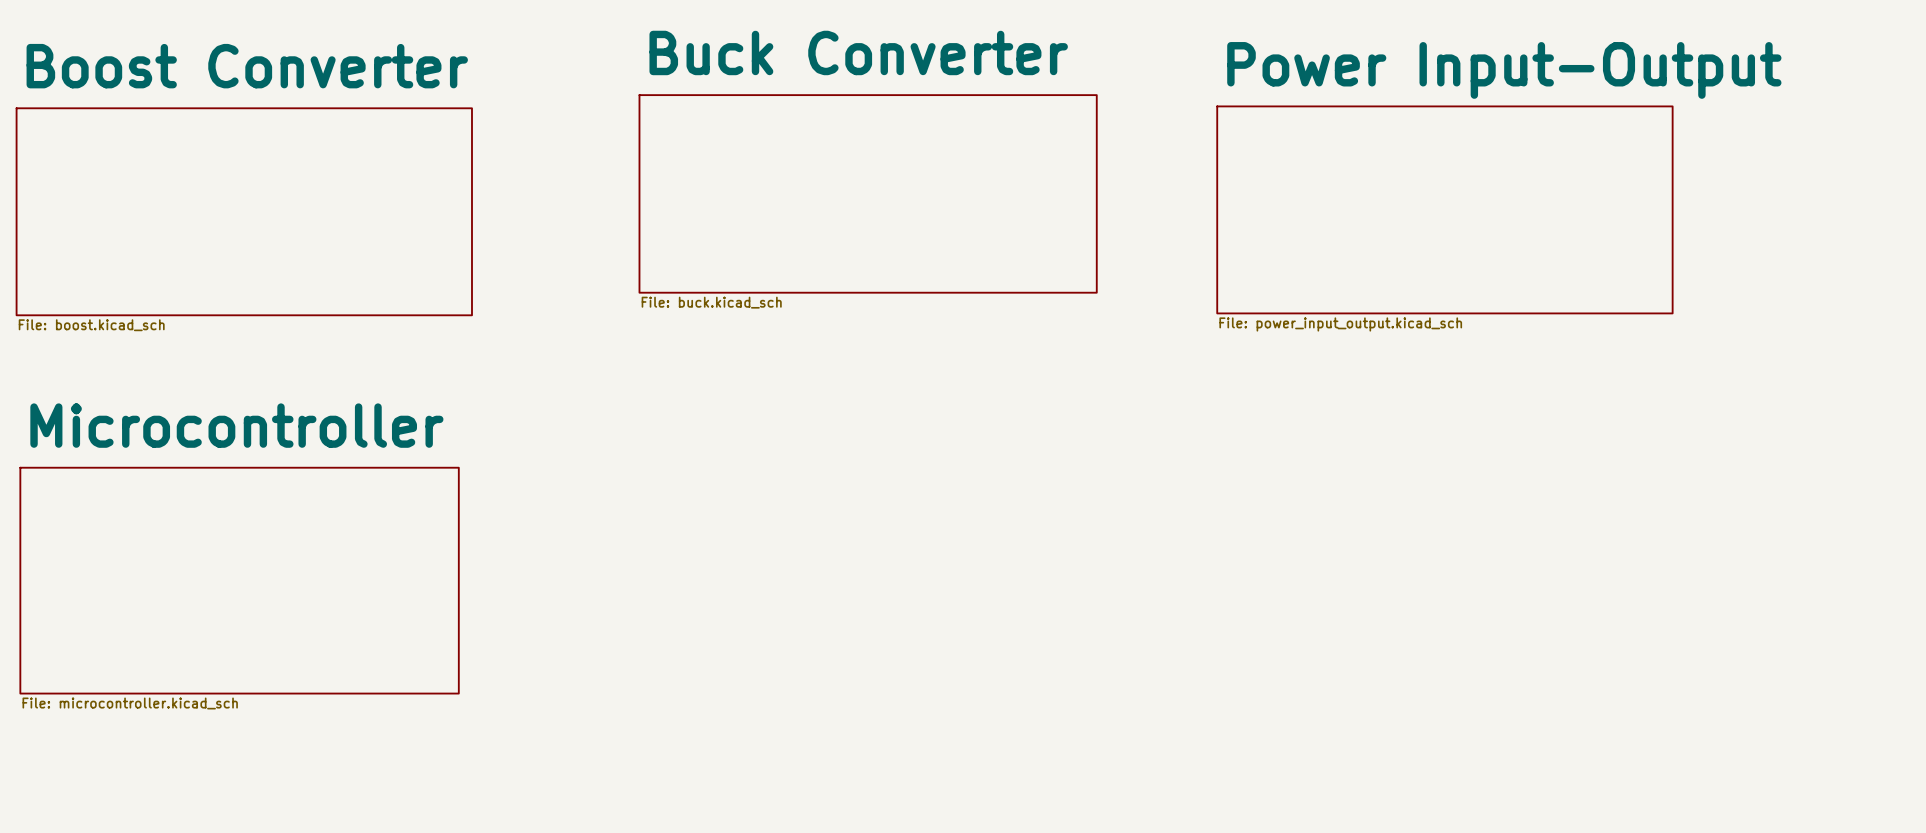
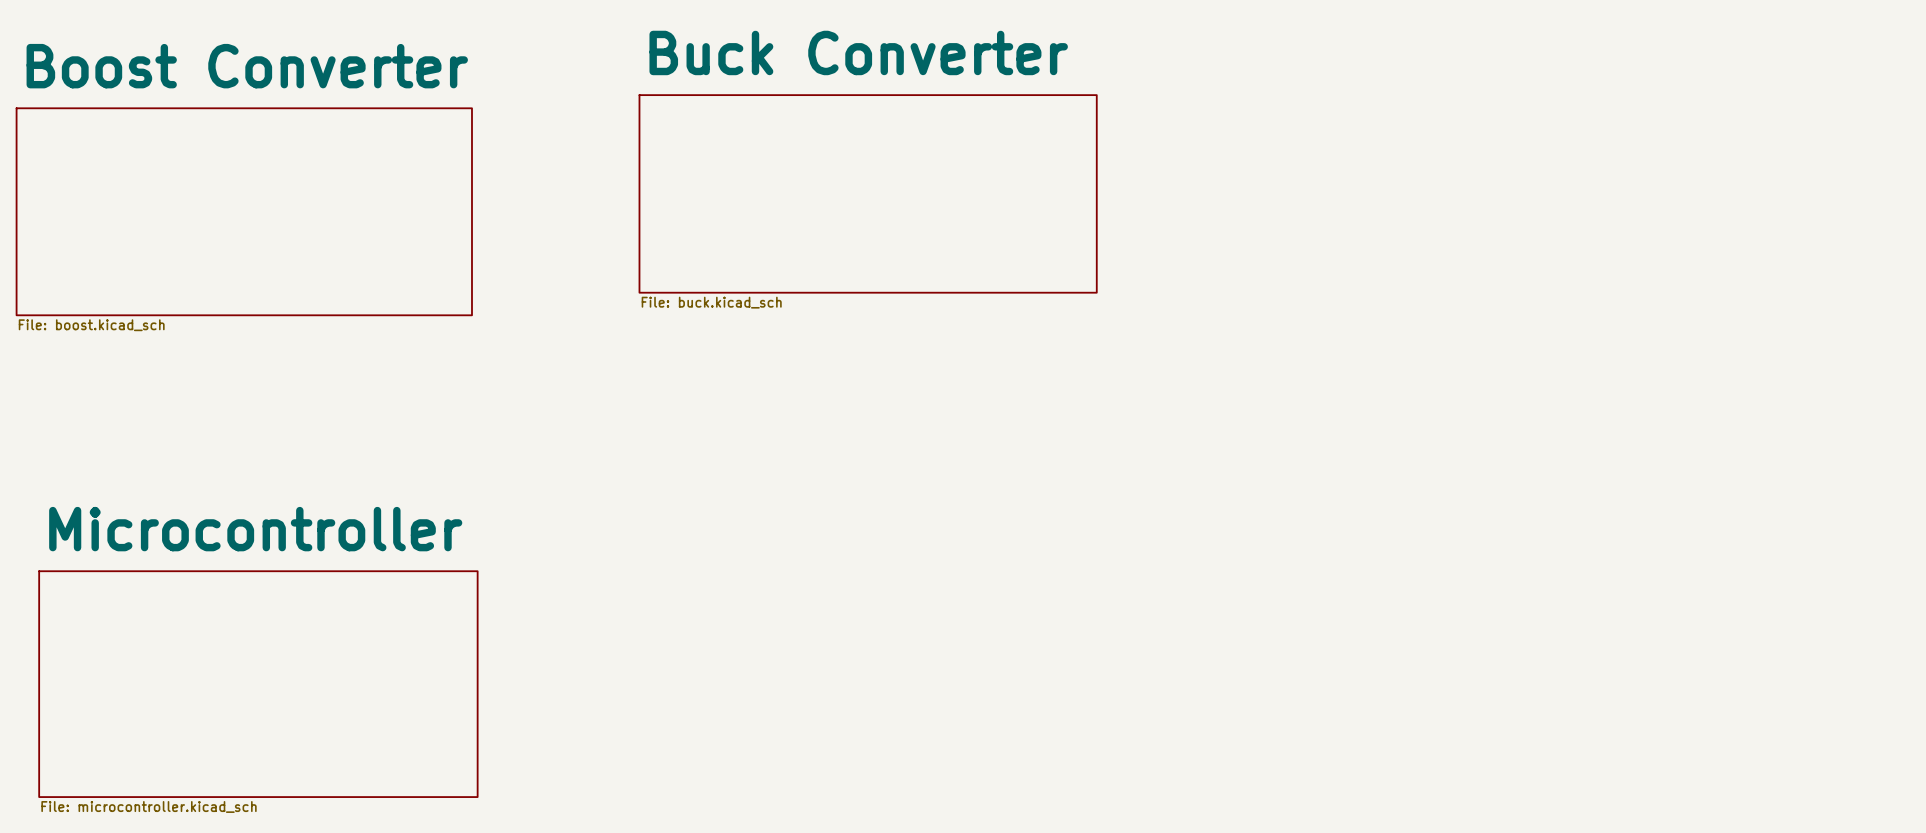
sheet Power Input-Output: File: power_input_output.kicad_sch (1444, 209) -> none
sheet Microcontroller position: (239, 580) -> (258, 684)

